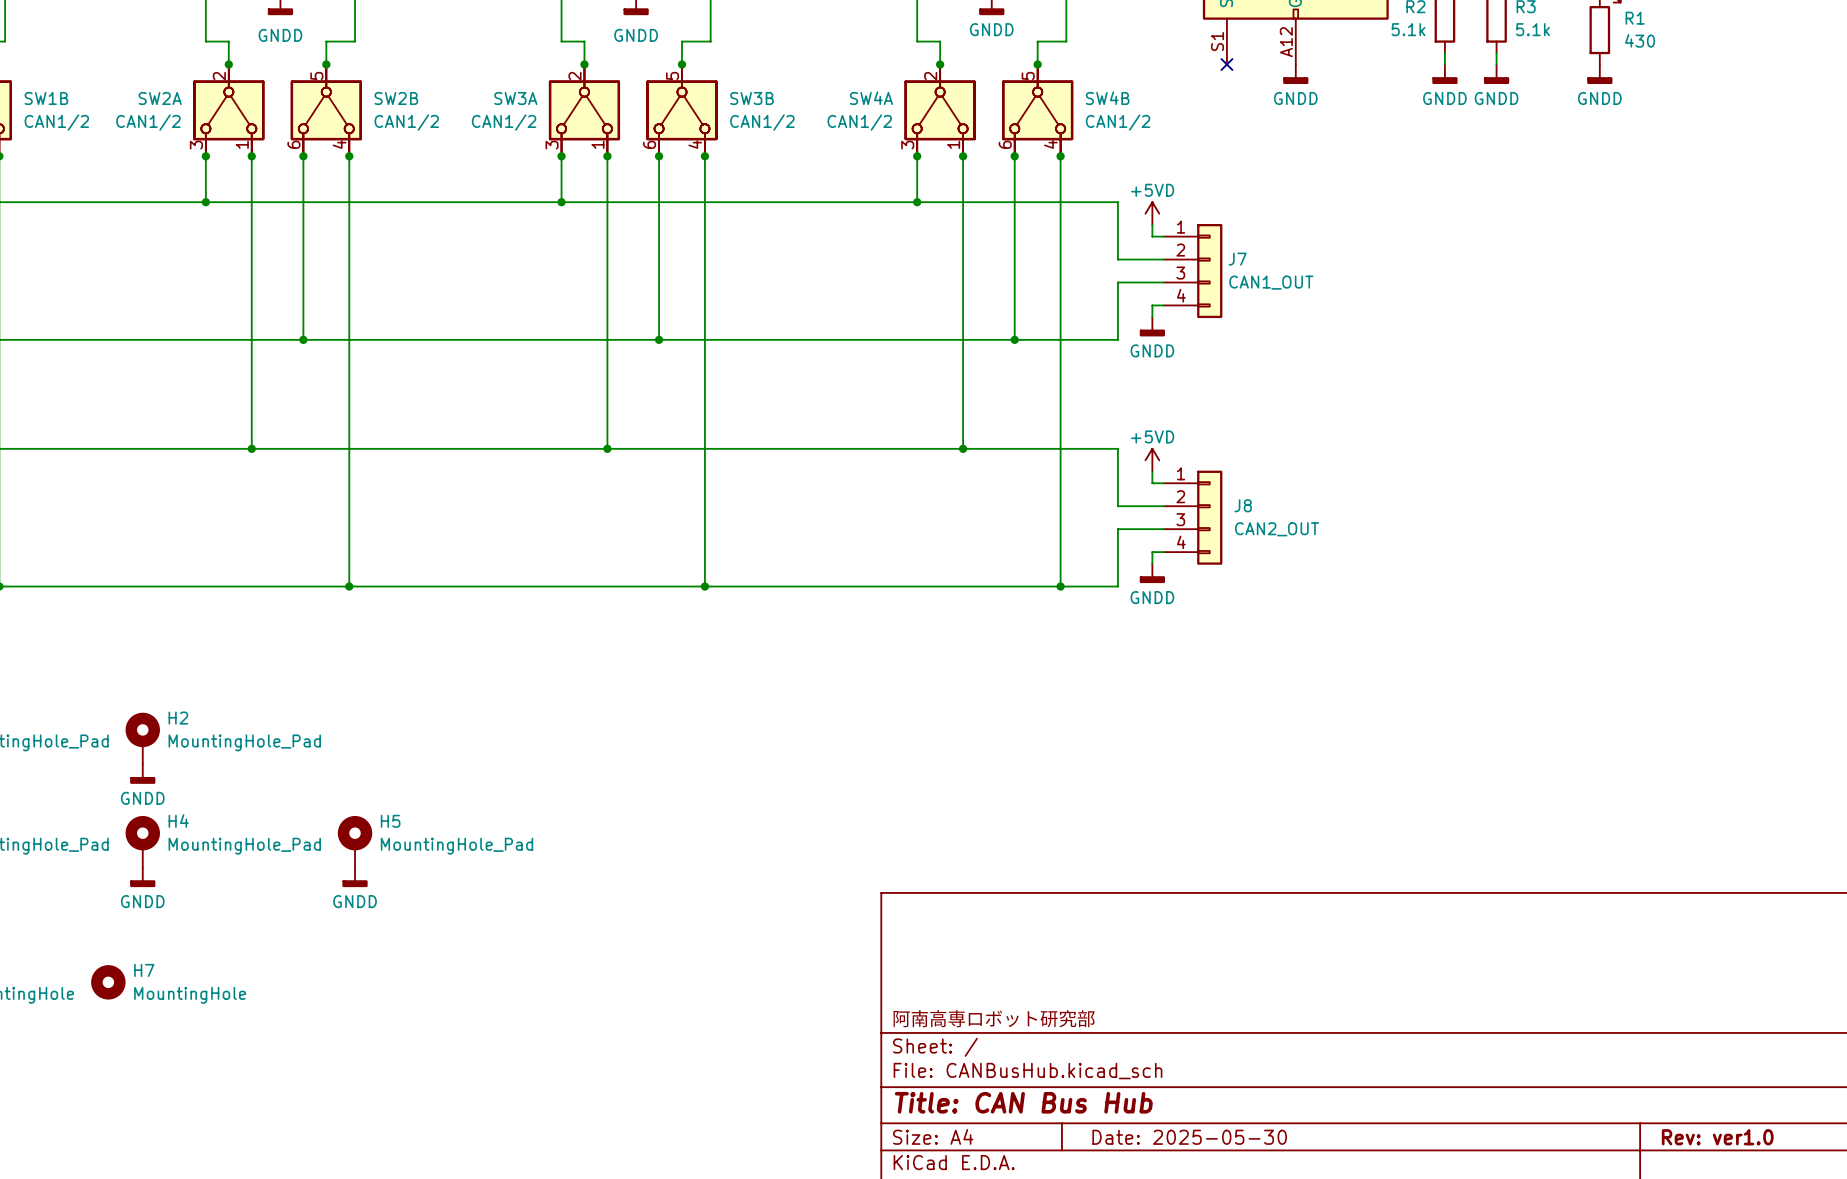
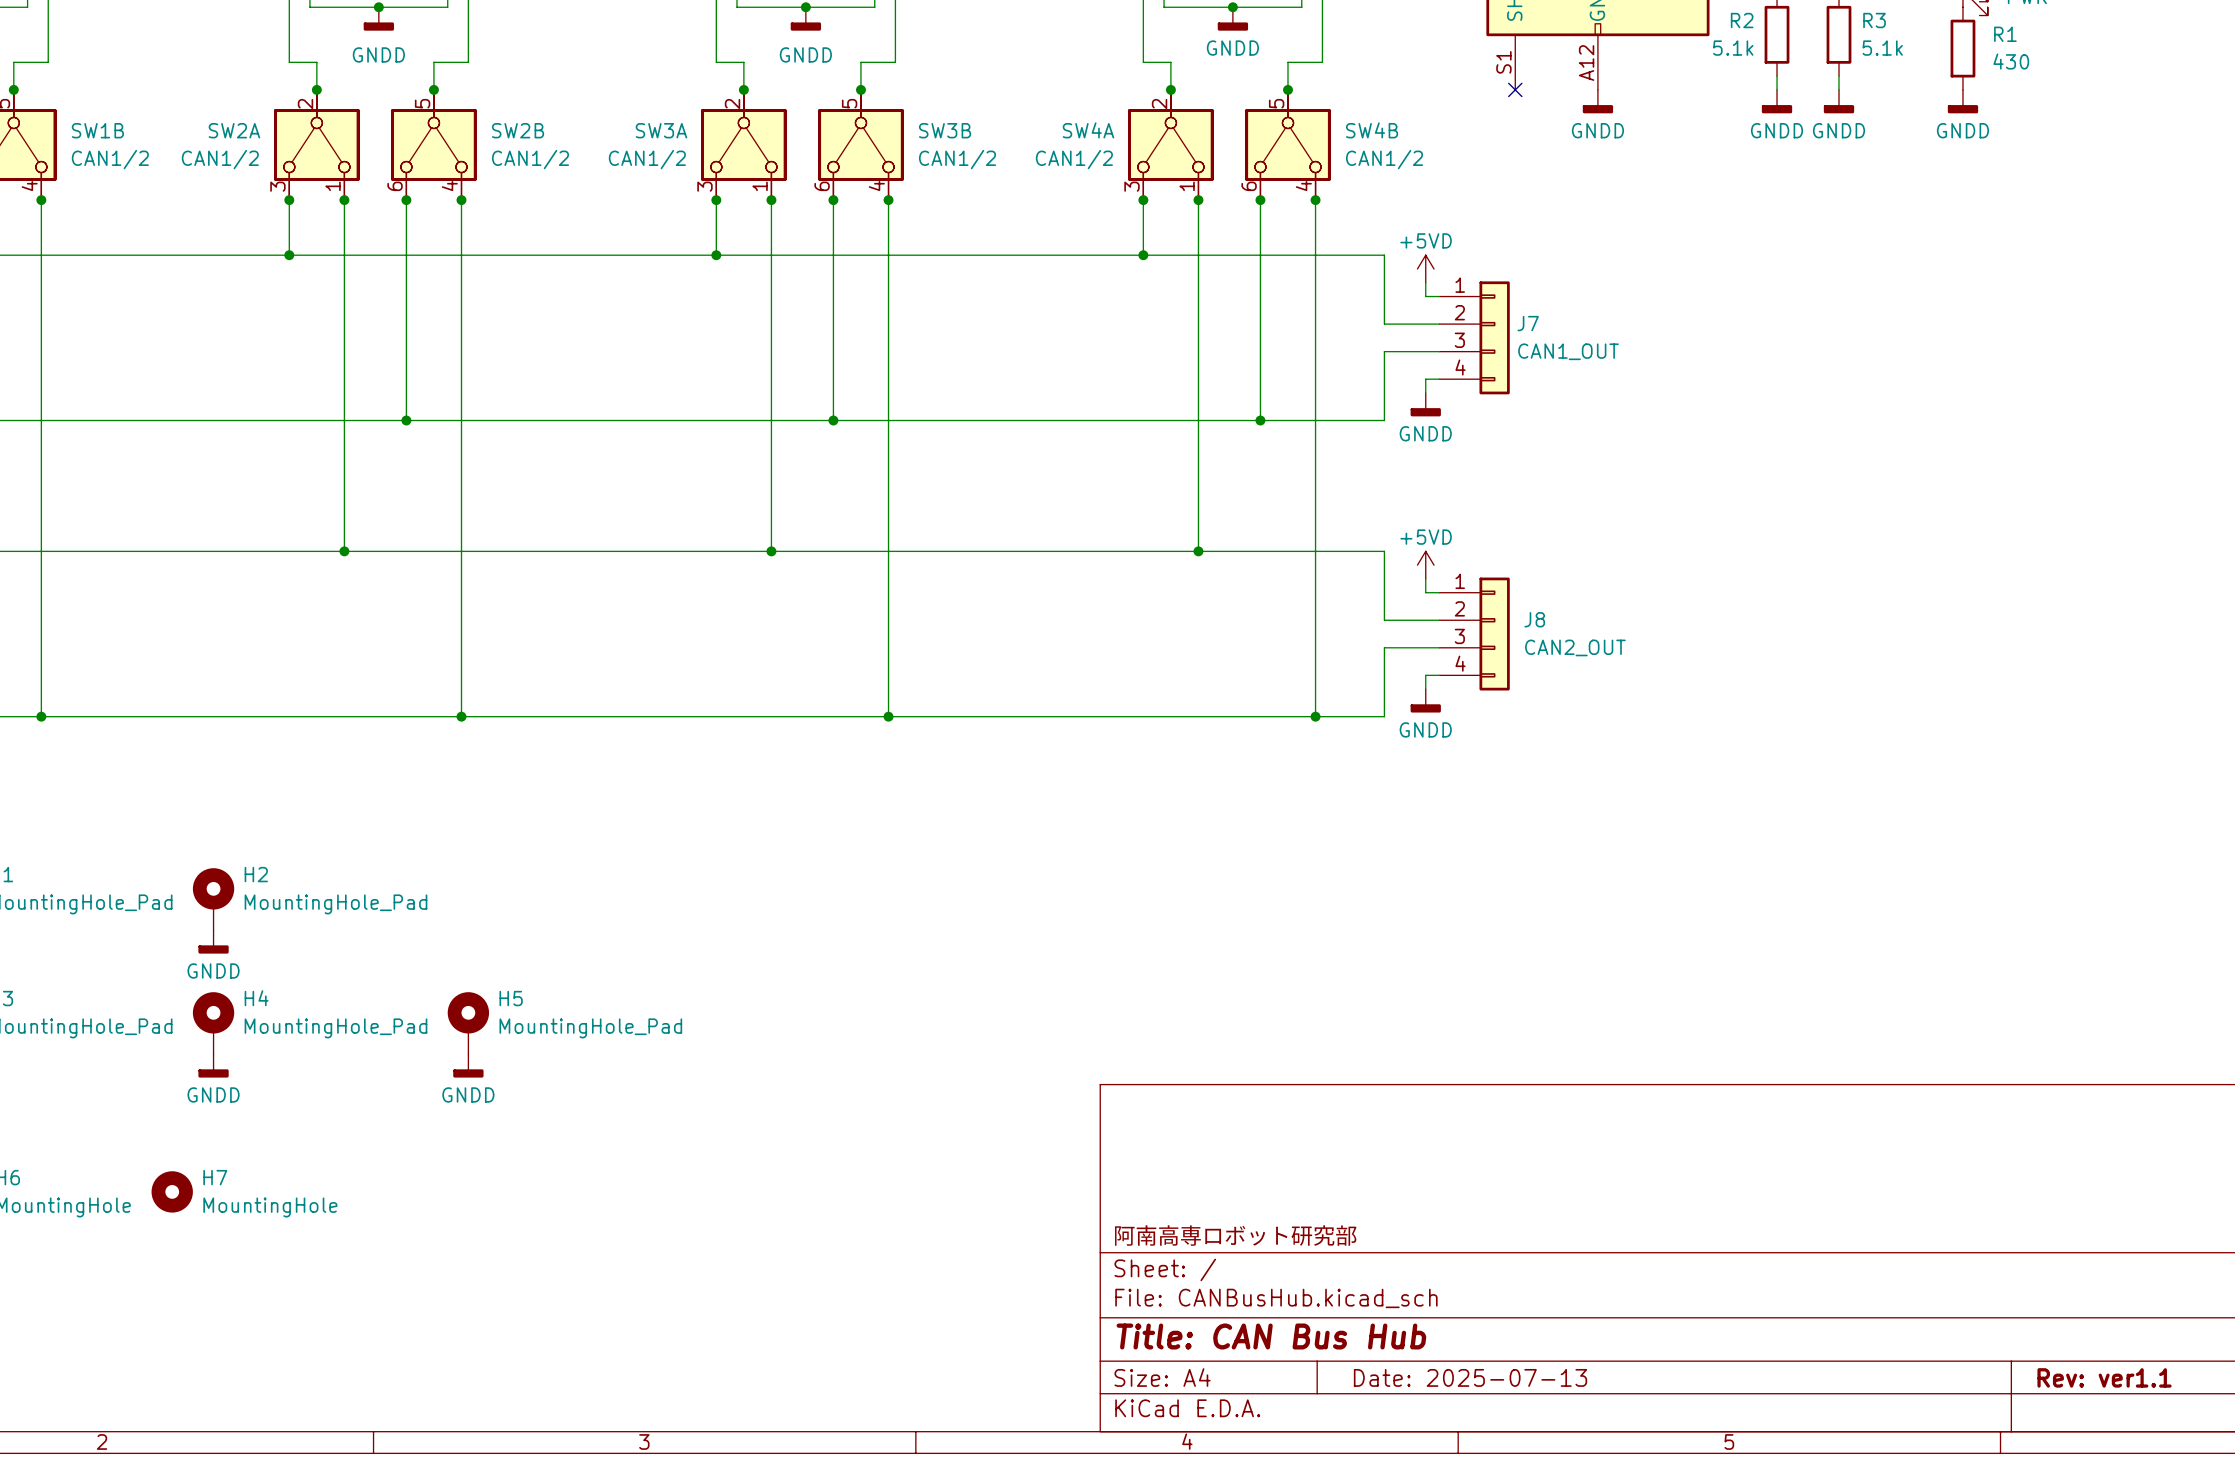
title block: Date: 2025-05-30 (1189, 1137) -> Date: 2025-07-13 (1470, 1377)
title block: Rev: ver1.0 (1717, 1137) -> Rev: ver1.1 (2104, 1377)

